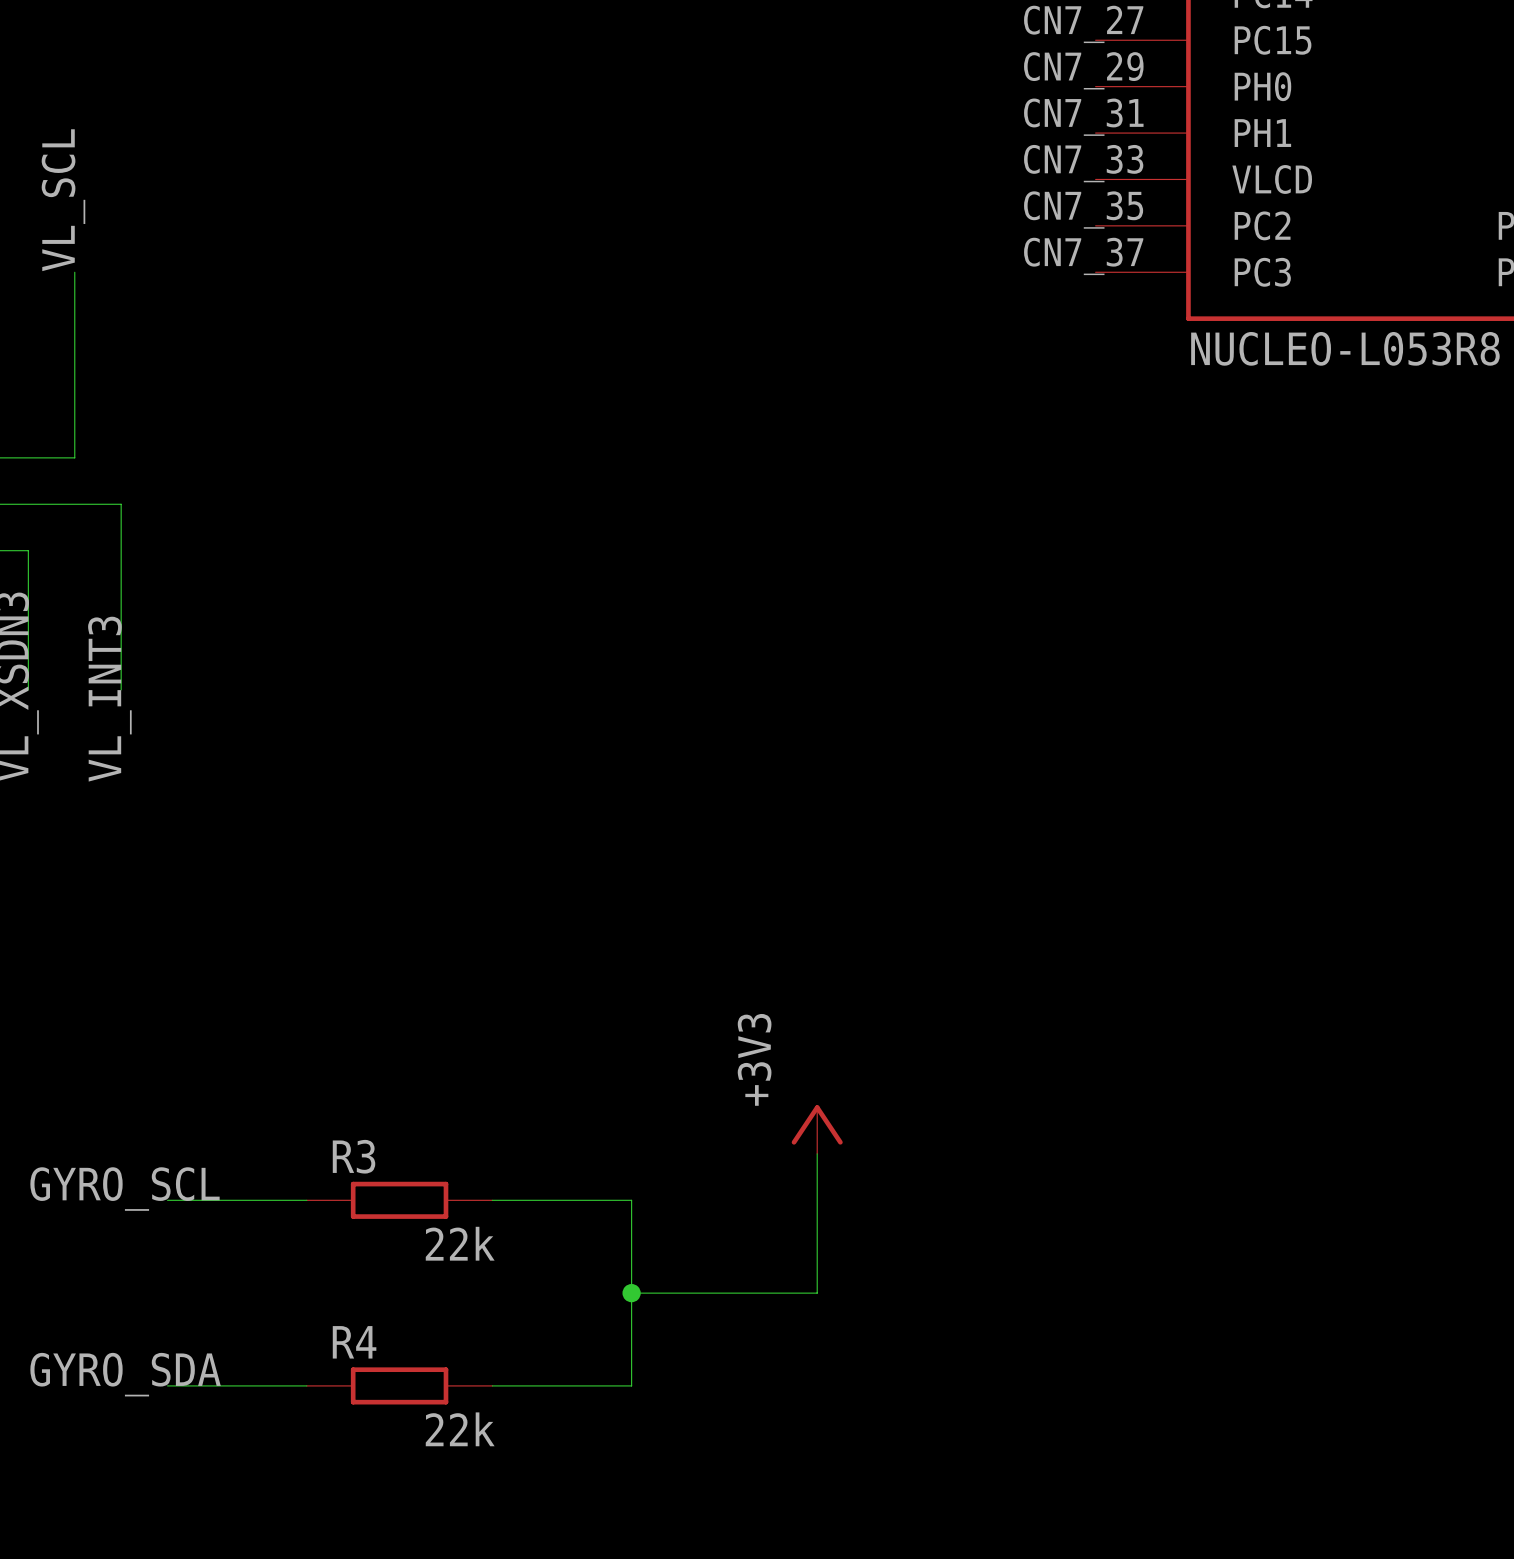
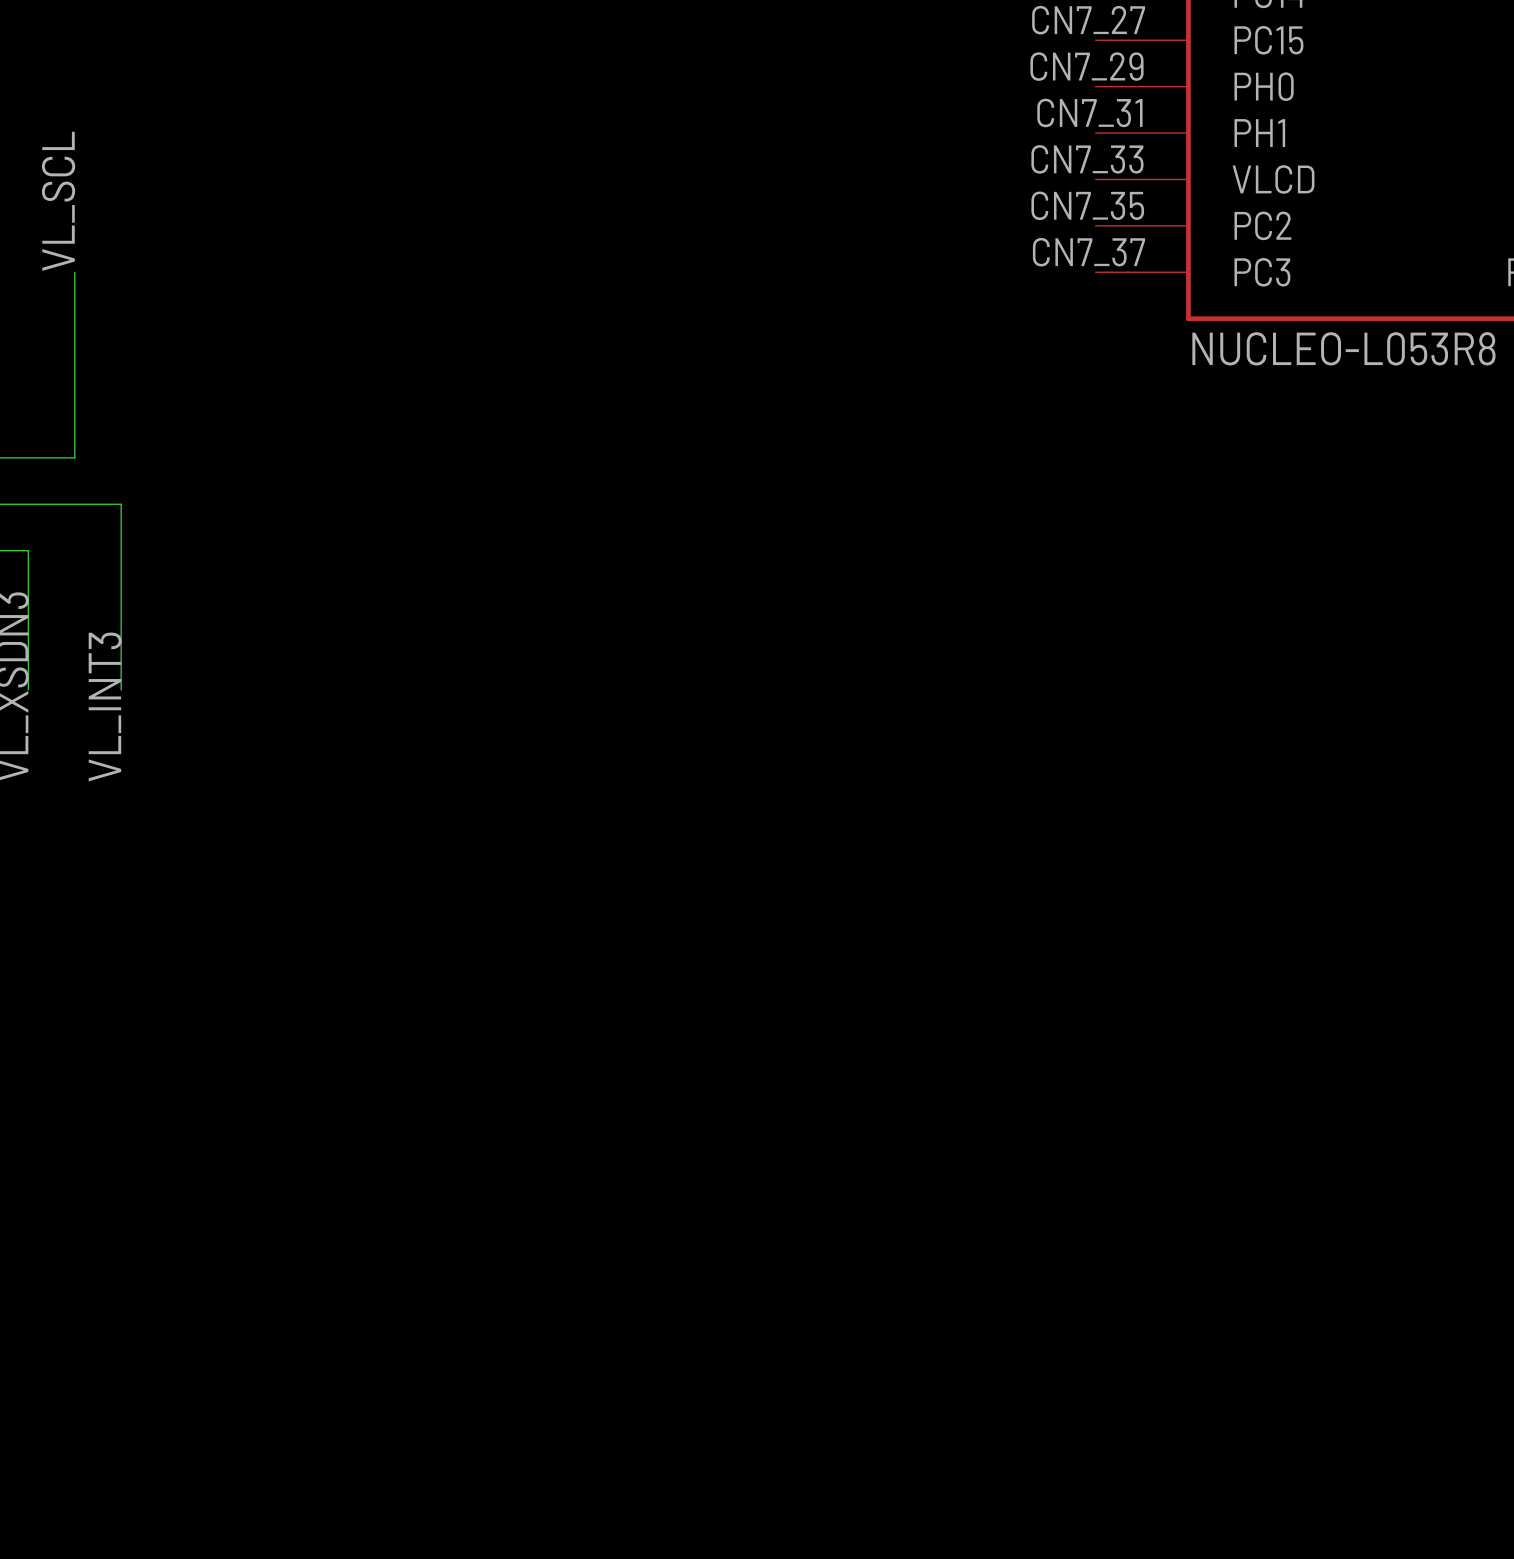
power symbol: +3V3 (817, 1129) -> none
wire: (817, 1153) (817, 1293) (631, 1293) -> none
label: GYRO_SCL (125, 1189) -> none
wire: (167, 1200) (306, 1200) -> none
R3: 22k (399, 1200) -> none
wire: (492, 1200) (631, 1200) (631, 1385) (492, 1385) -> none
junction: (631, 1293) -> none
label: GYRO_SDA (125, 1374) -> none
wire: (167, 1385) (306, 1385) -> none
R4: 22k (399, 1385) -> none

